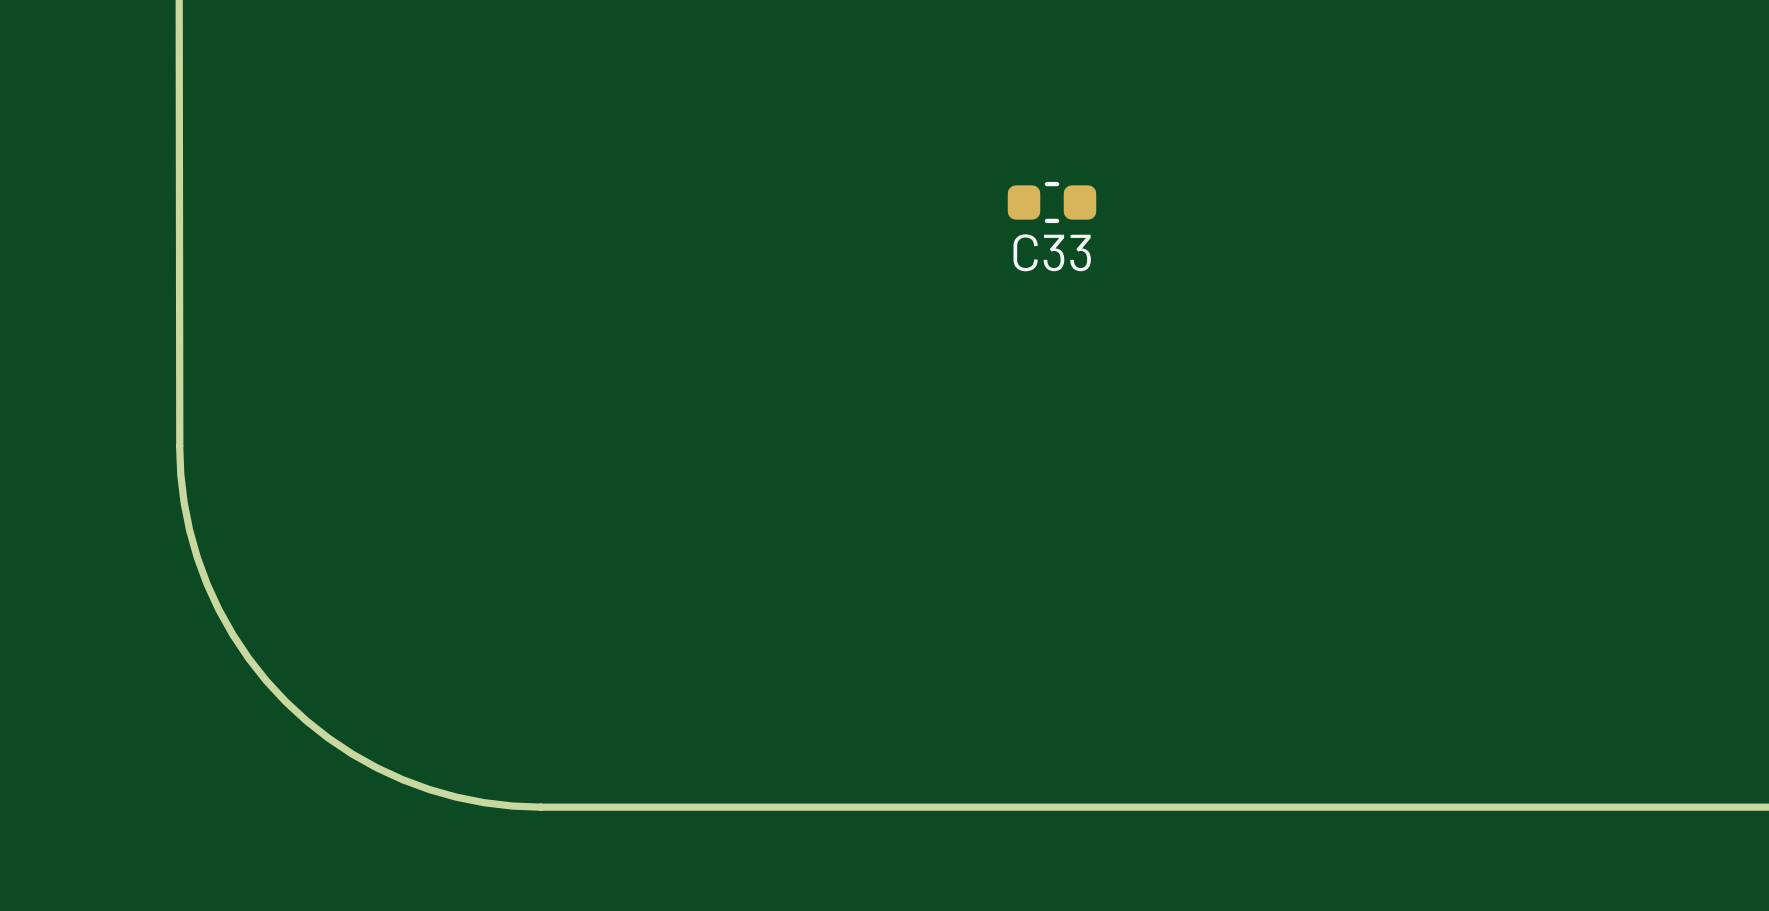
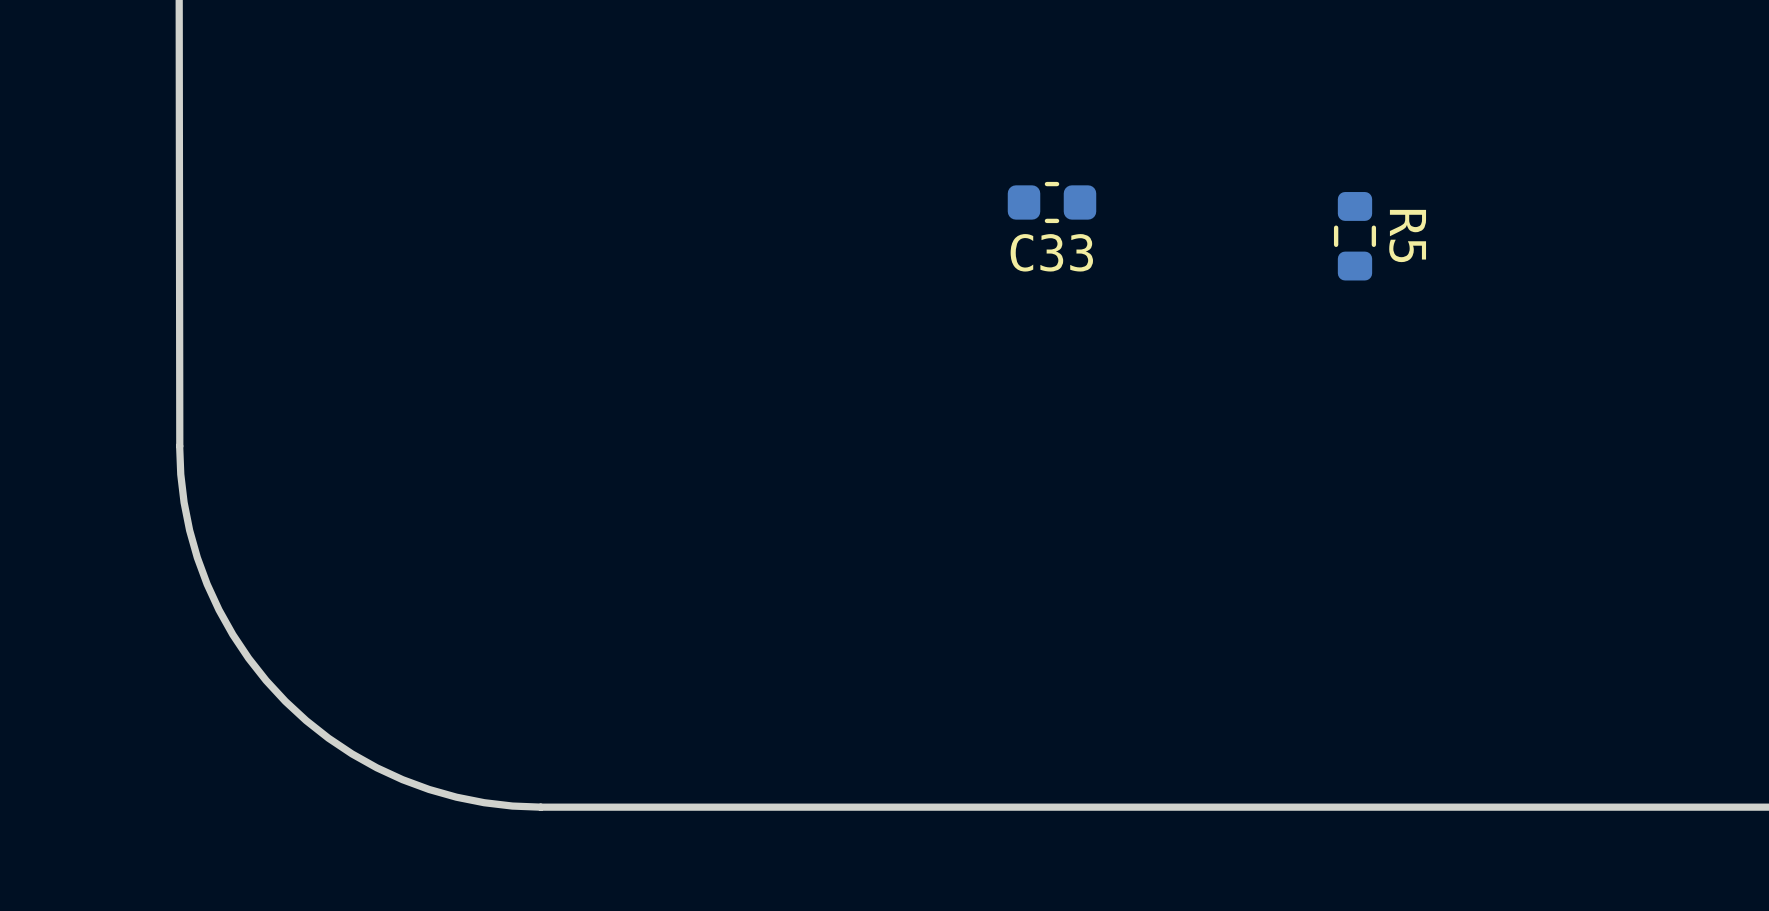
R5: none -> (1354, 236)

